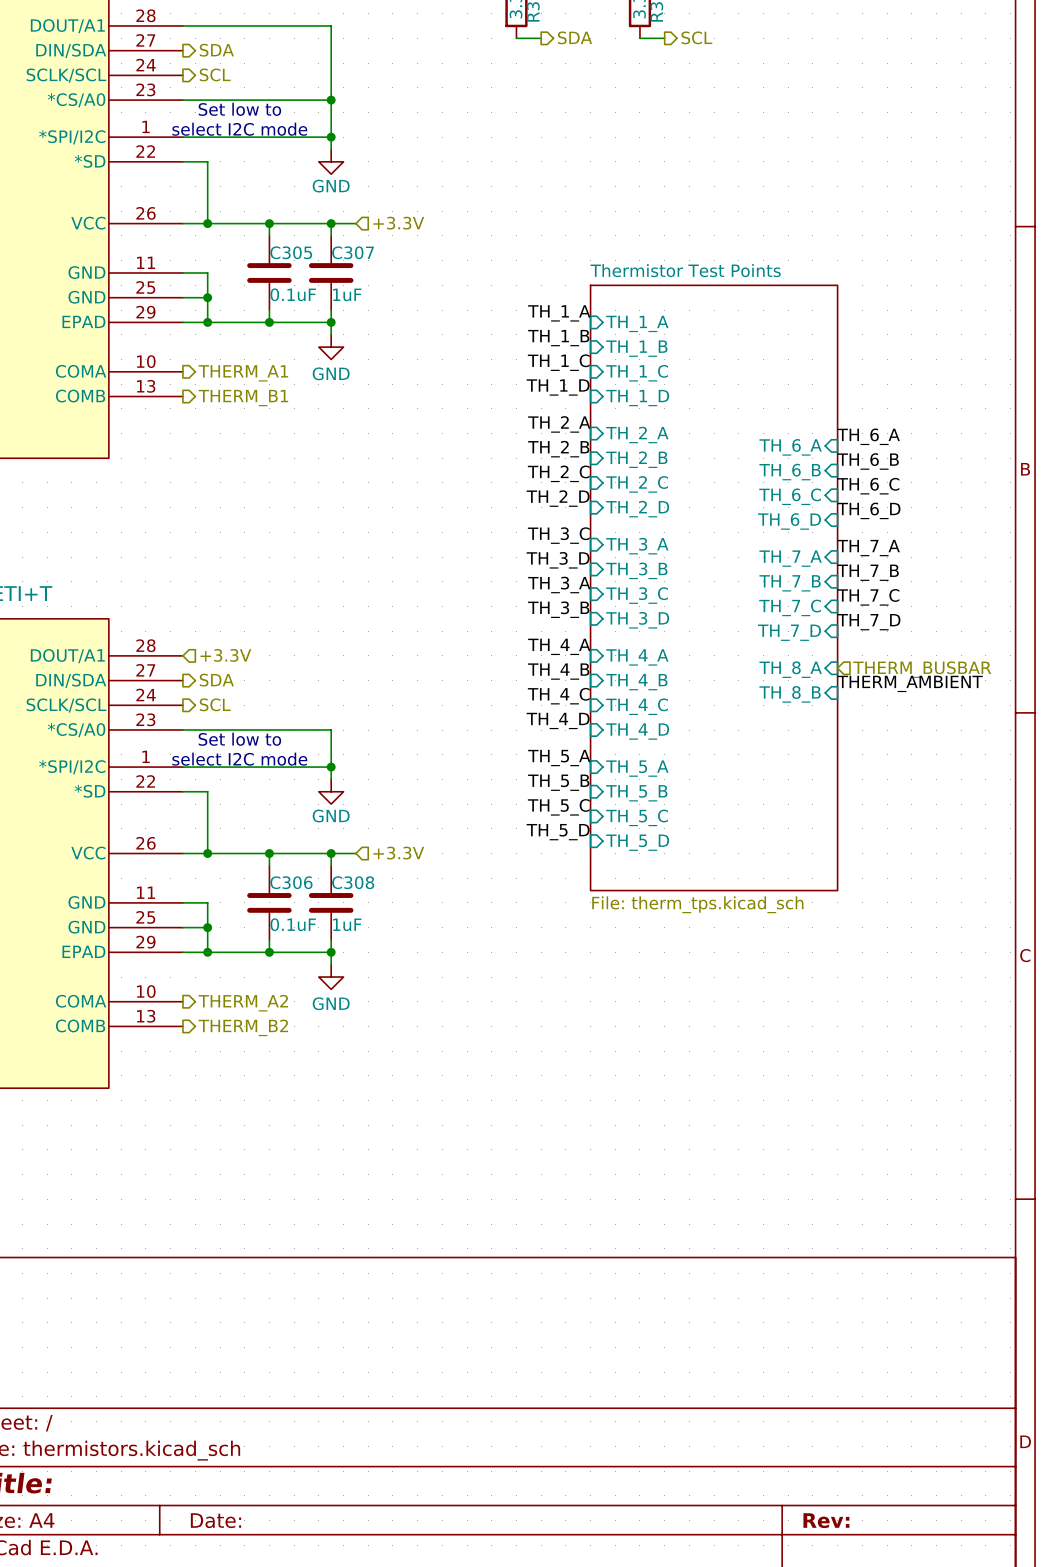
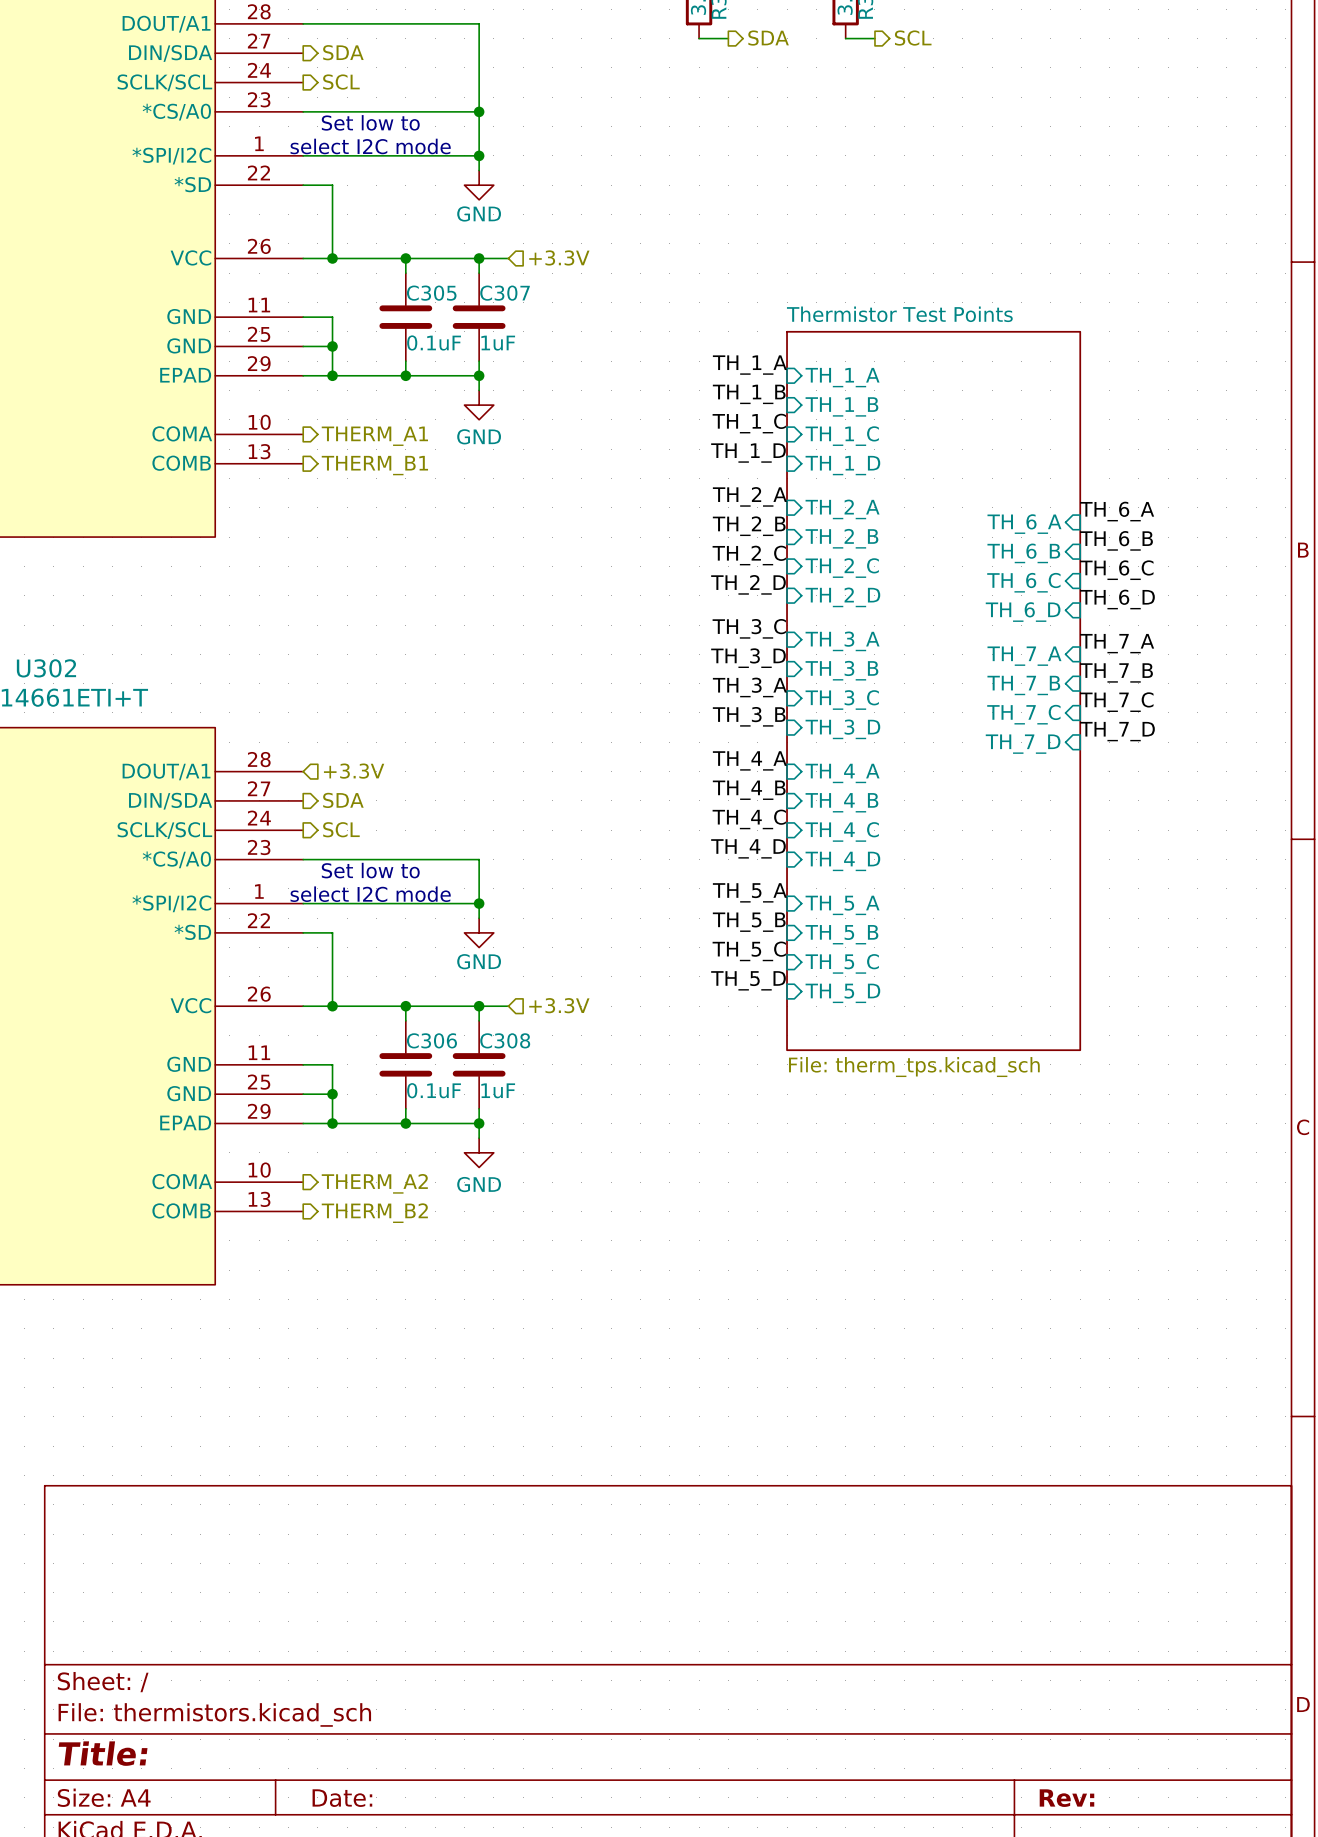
sheet pin: TH_8_A (790, 669) -> none
hierarchical label: THERM_BUSBAR (922, 669) -> none
label: THERM_AMBIENT (910, 683) -> none
sheet pin: TH_8_B (790, 694) -> none

